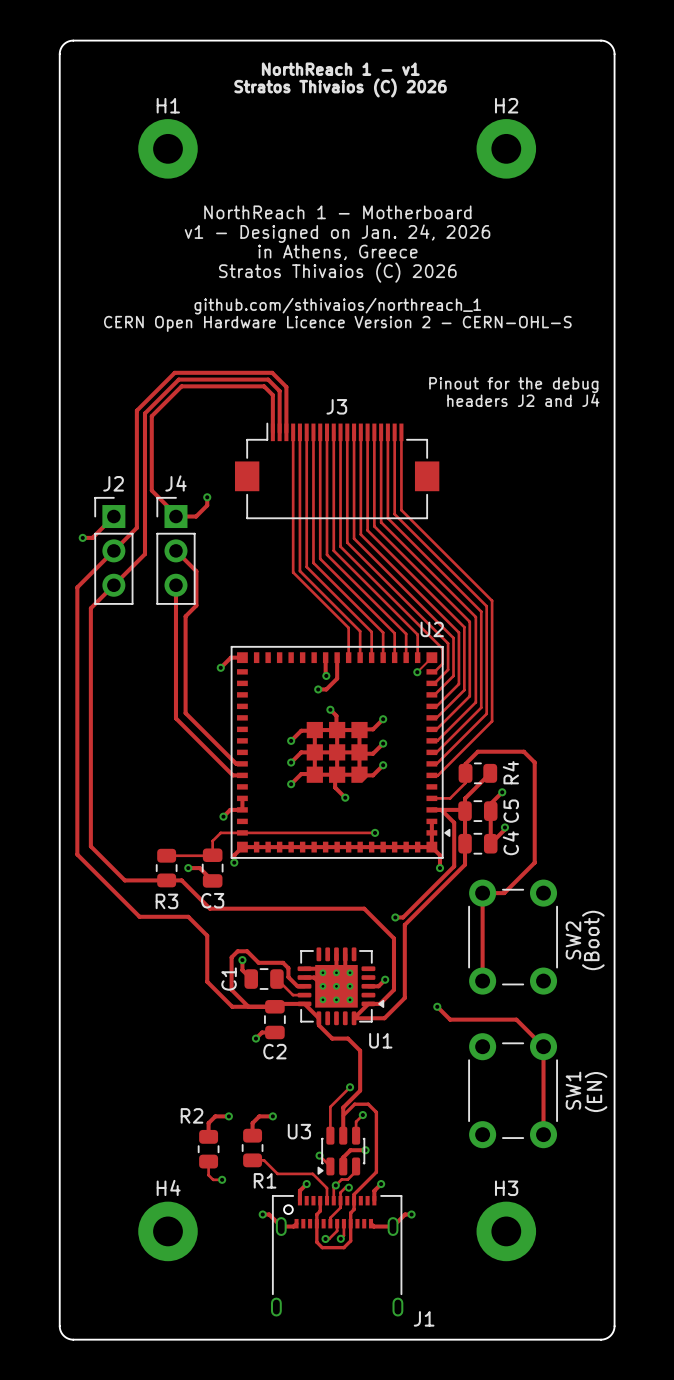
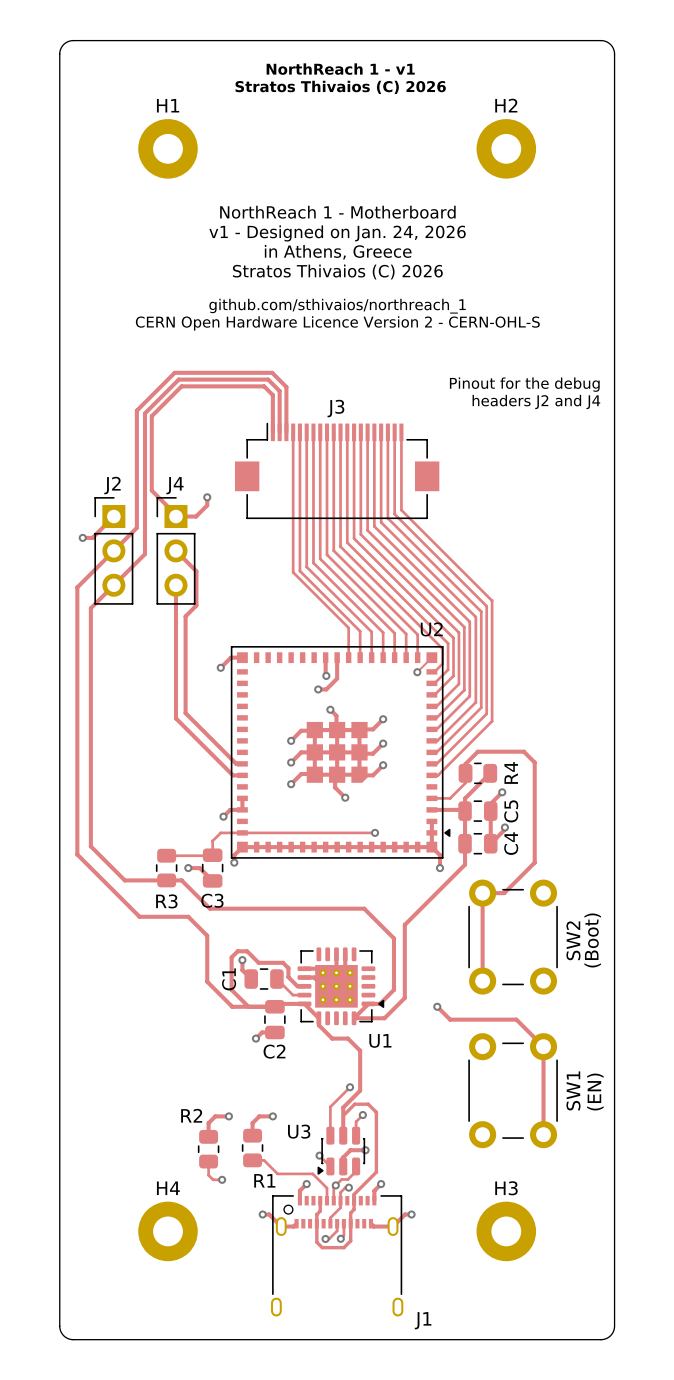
track: (441, 809) (454, 822) (454, 866) (403, 917) (395, 917) -> none
via: (395, 917) -> none
track: (385, 979) (378, 986) (368, 986) -> none
via: (385, 979) -> none

